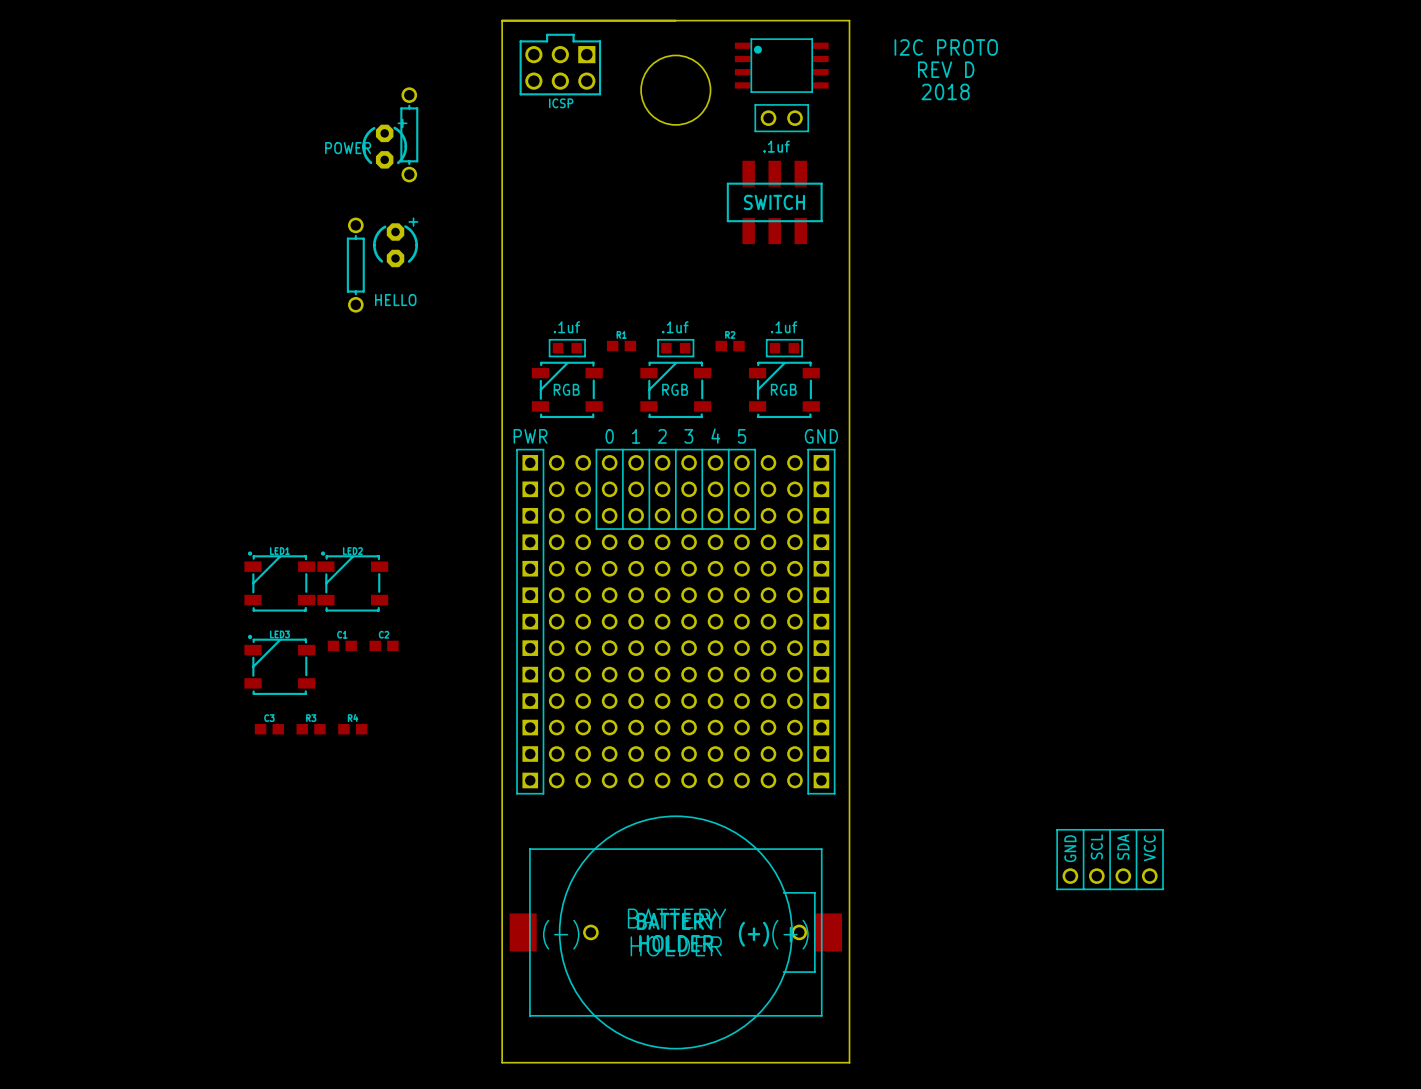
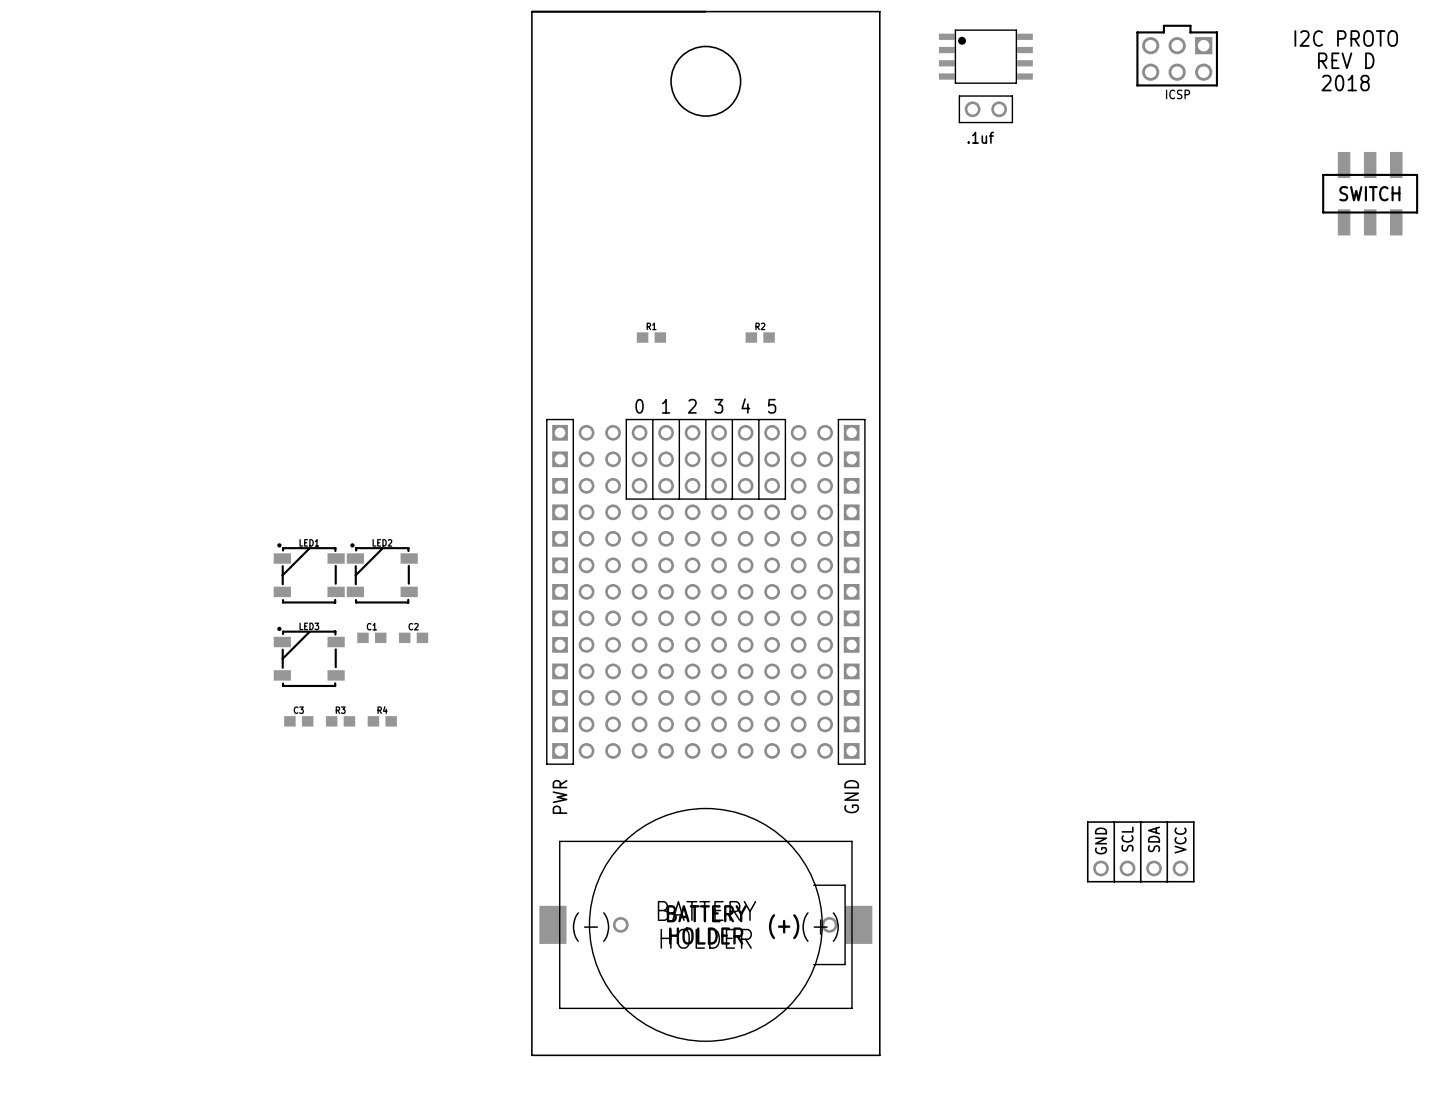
text: I2C PROTO (946, 47) -> none
text: none -> I2C PROTO (1346, 38)
part: (560, 64) -> none
part: none -> (1177, 55)
part position: (781, 65) -> (985, 56)
text: REV D (946, 69) -> none
text: none -> REV D (1346, 60)
text: 2018 (945, 91) -> none
text: none -> 2018 (1345, 83)
part position: (781, 118) -> (985, 109)
part: (409, 134) -> none
part: (384, 143) -> none
text position: .1uf (776, 146) -> .1uf (980, 137)
text: POWER (348, 148) -> none
part: (774, 202) -> none
part: none -> (1370, 193)
part: (395, 242) -> none
part: (355, 265) -> none
text: HELLO (395, 300) -> none
part: (567, 378) -> none
part: (675, 378) -> none
part: (784, 378) -> none
part: none -> (705, 591)
part: (675, 621) -> none

